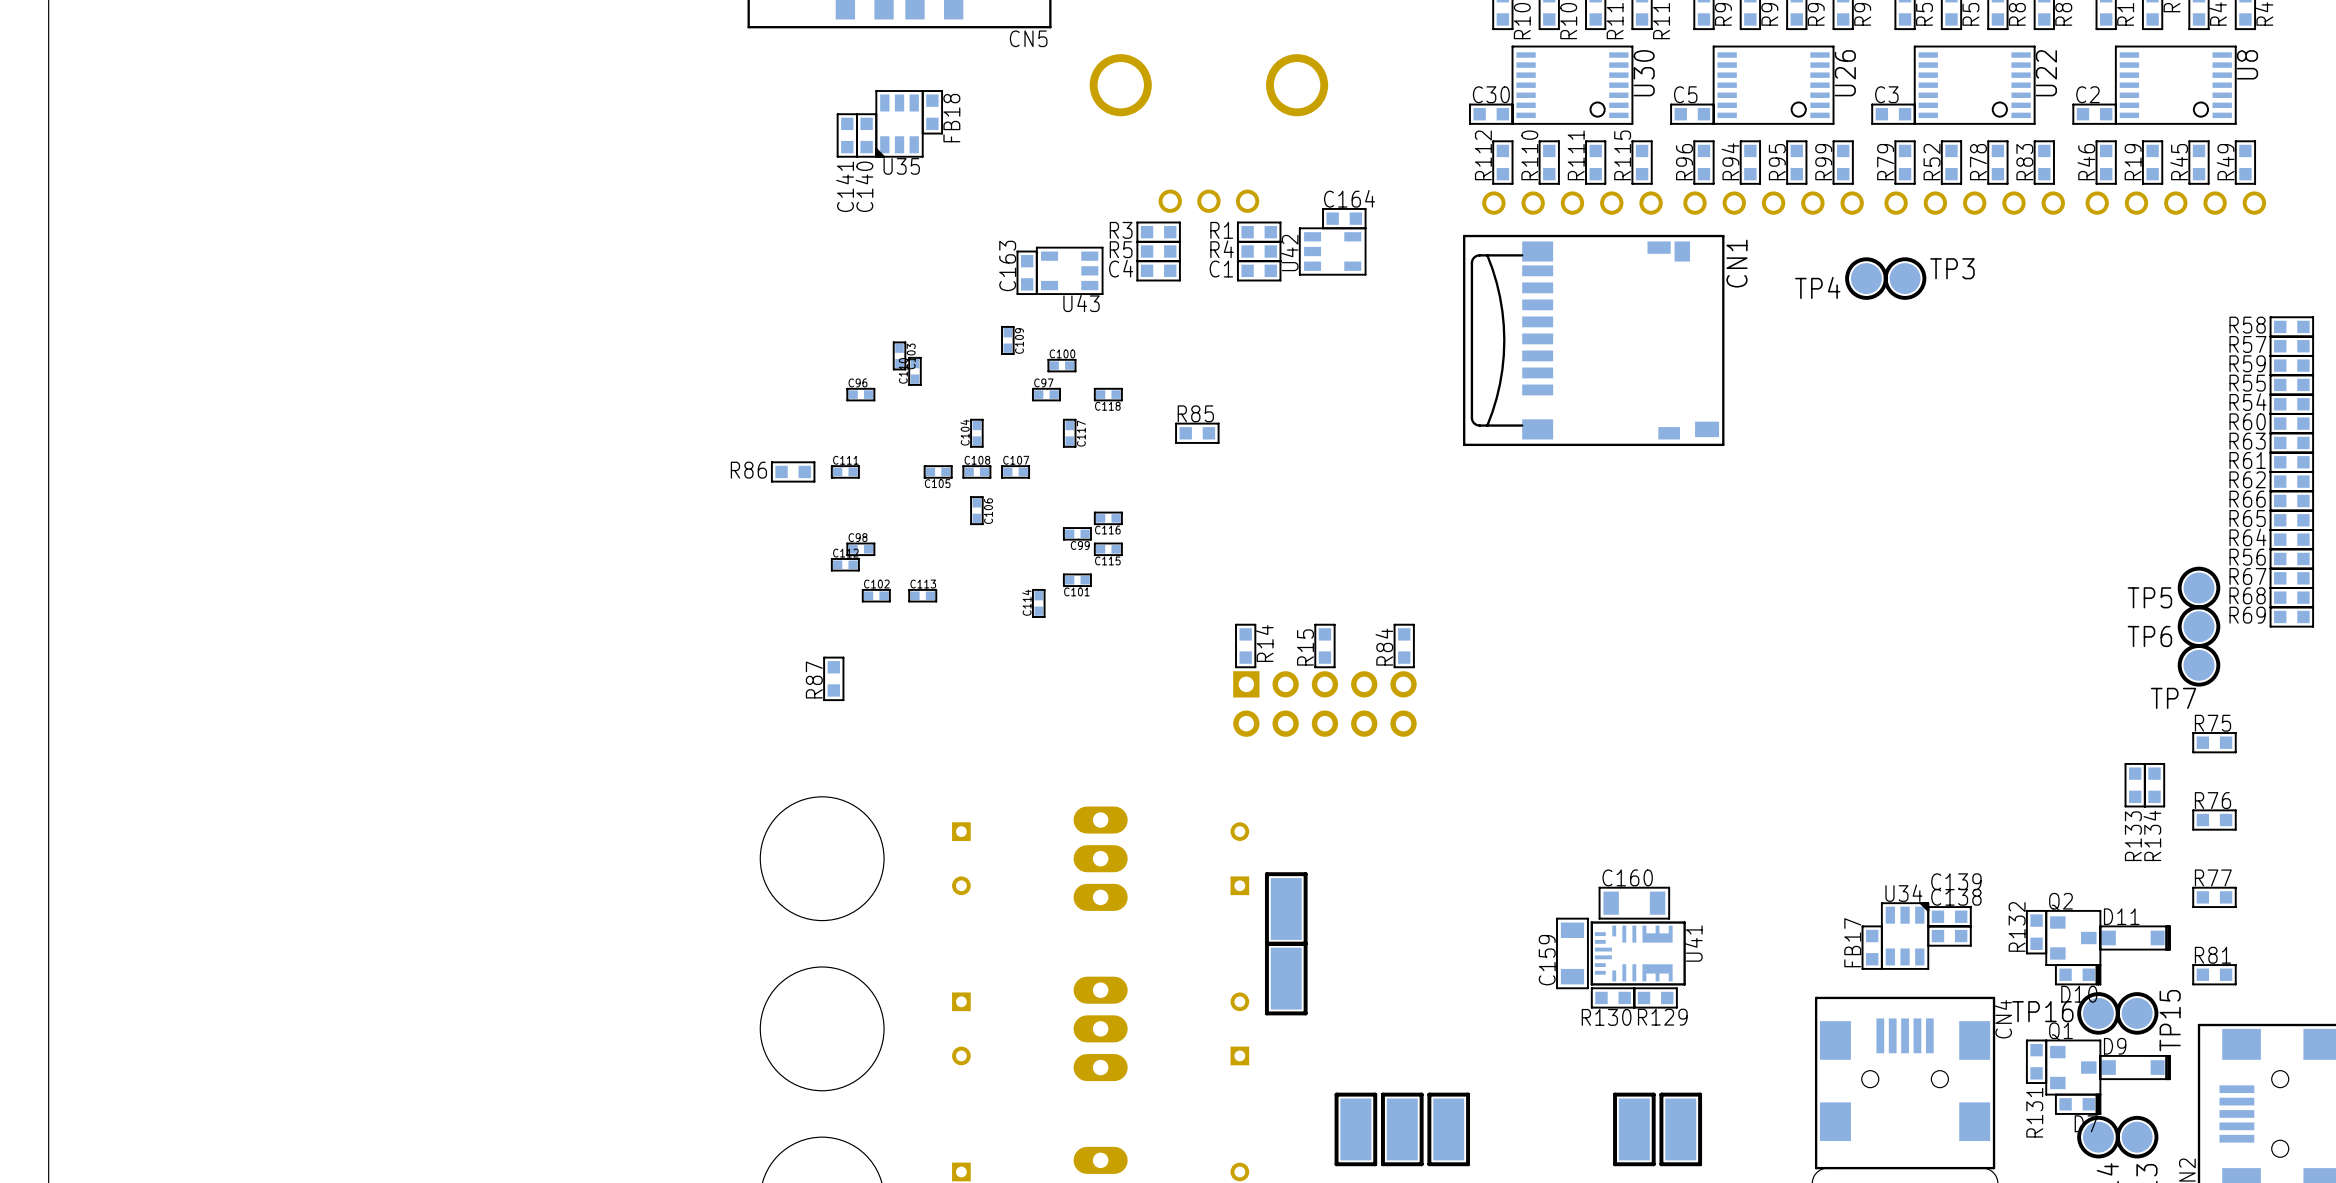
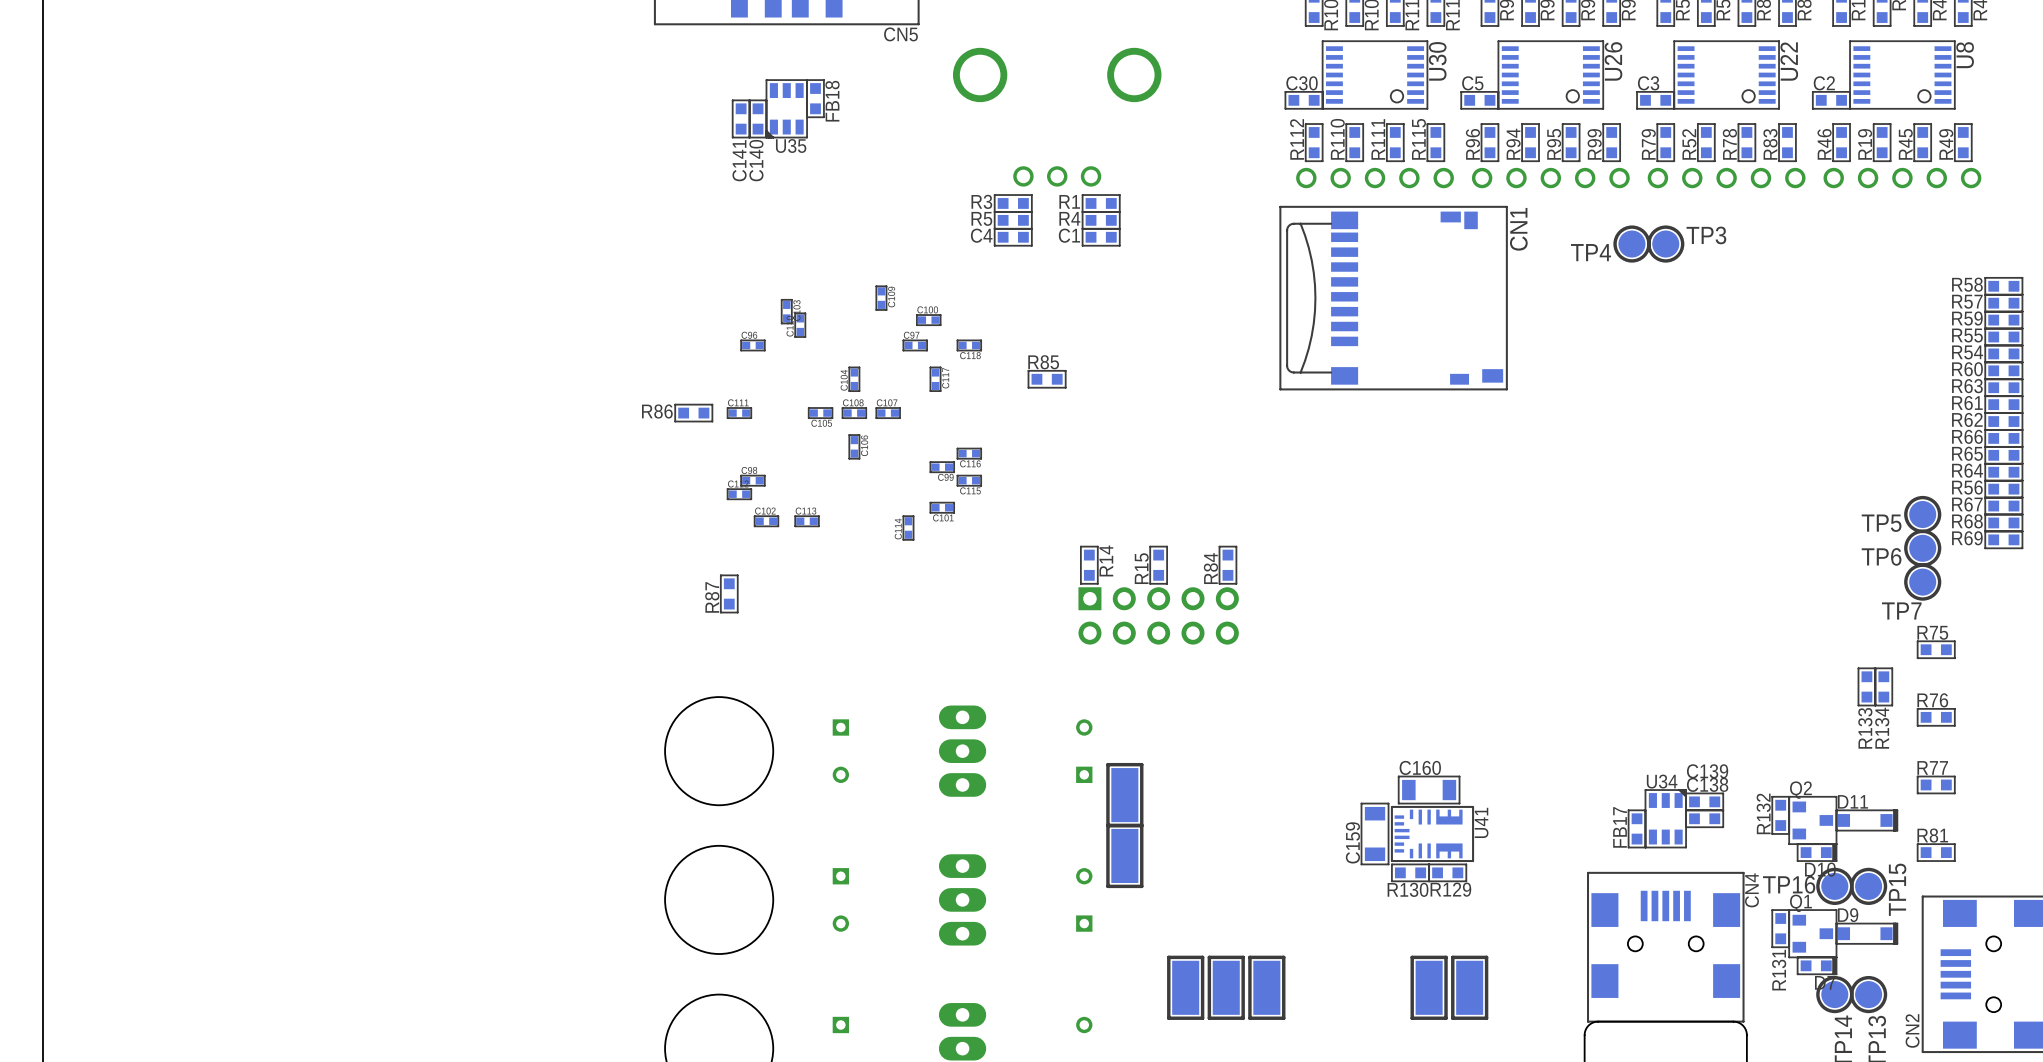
C164: (1344, 218) -> none
U42: (1332, 251) -> none
U43: (1069, 270) -> none
C163: (1027, 272) -> none

